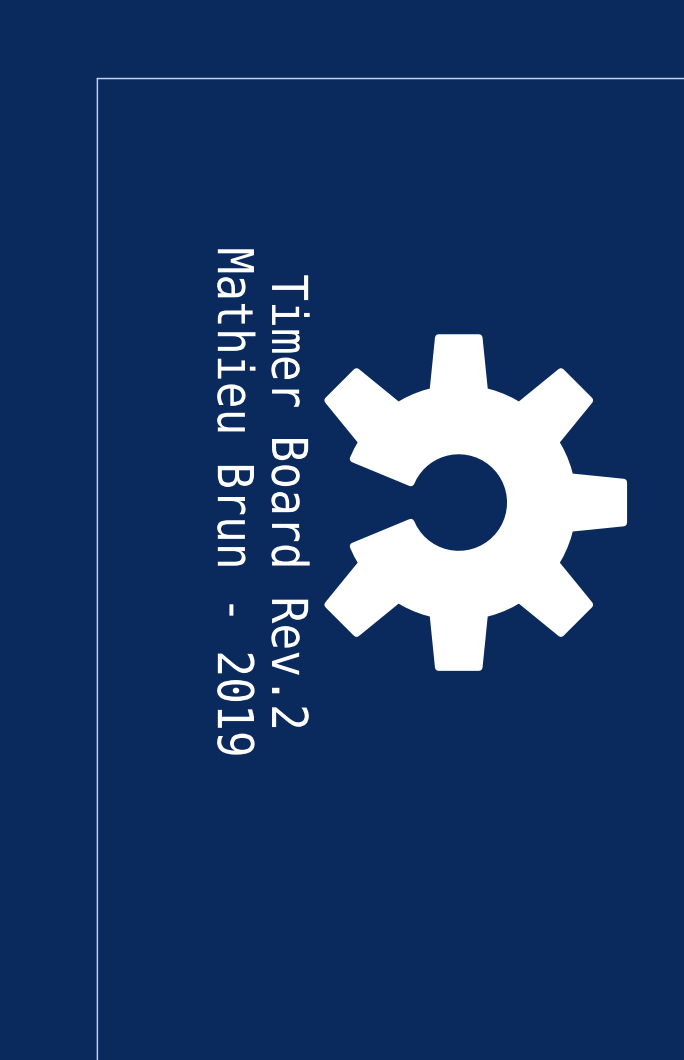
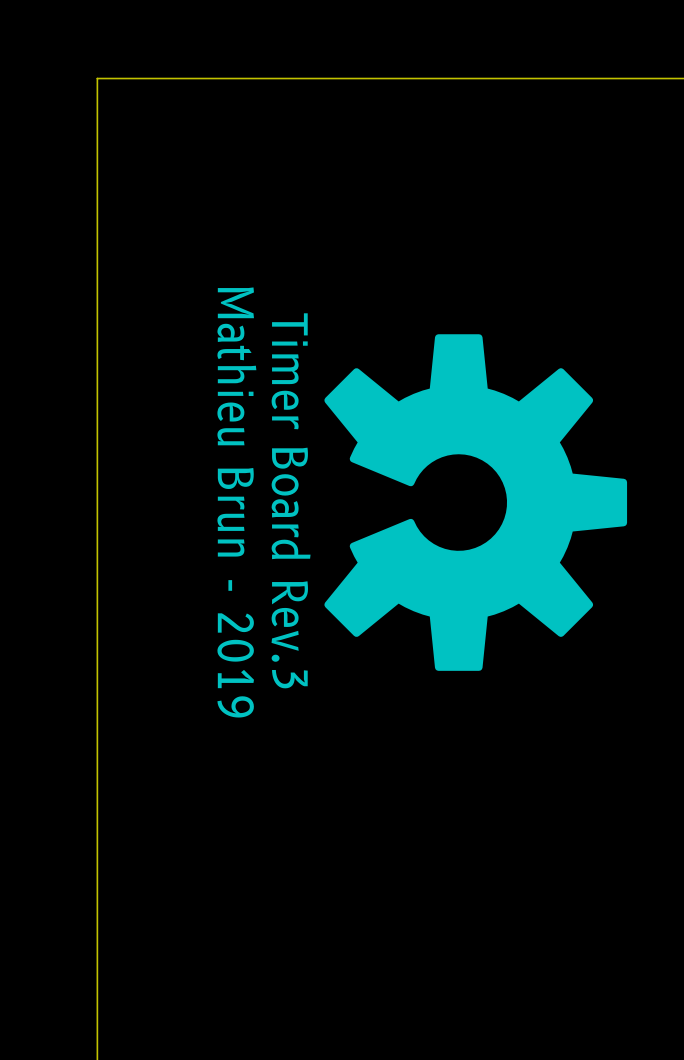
text: Timer Board Rev.2 (290, 501) -> Timer Board Rev.3 (291, 500)

